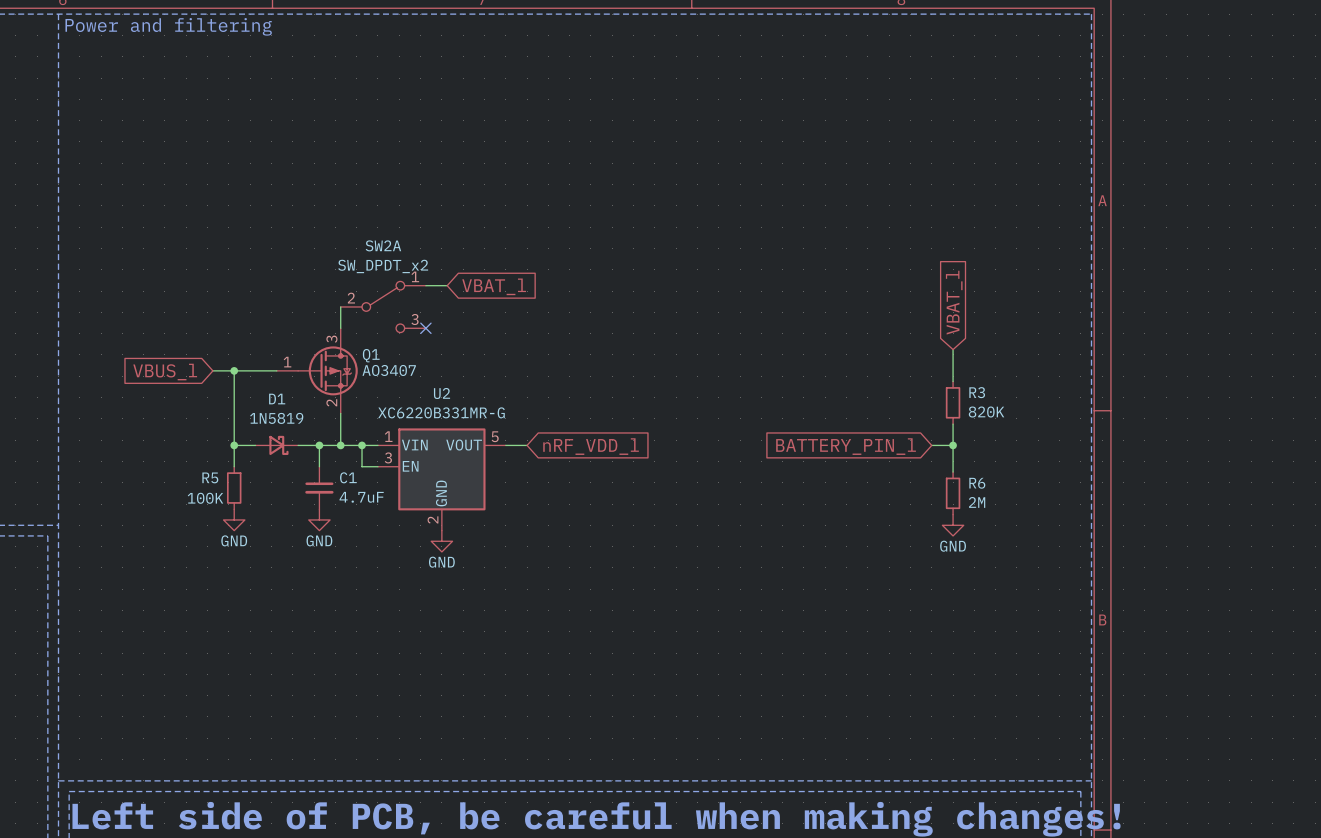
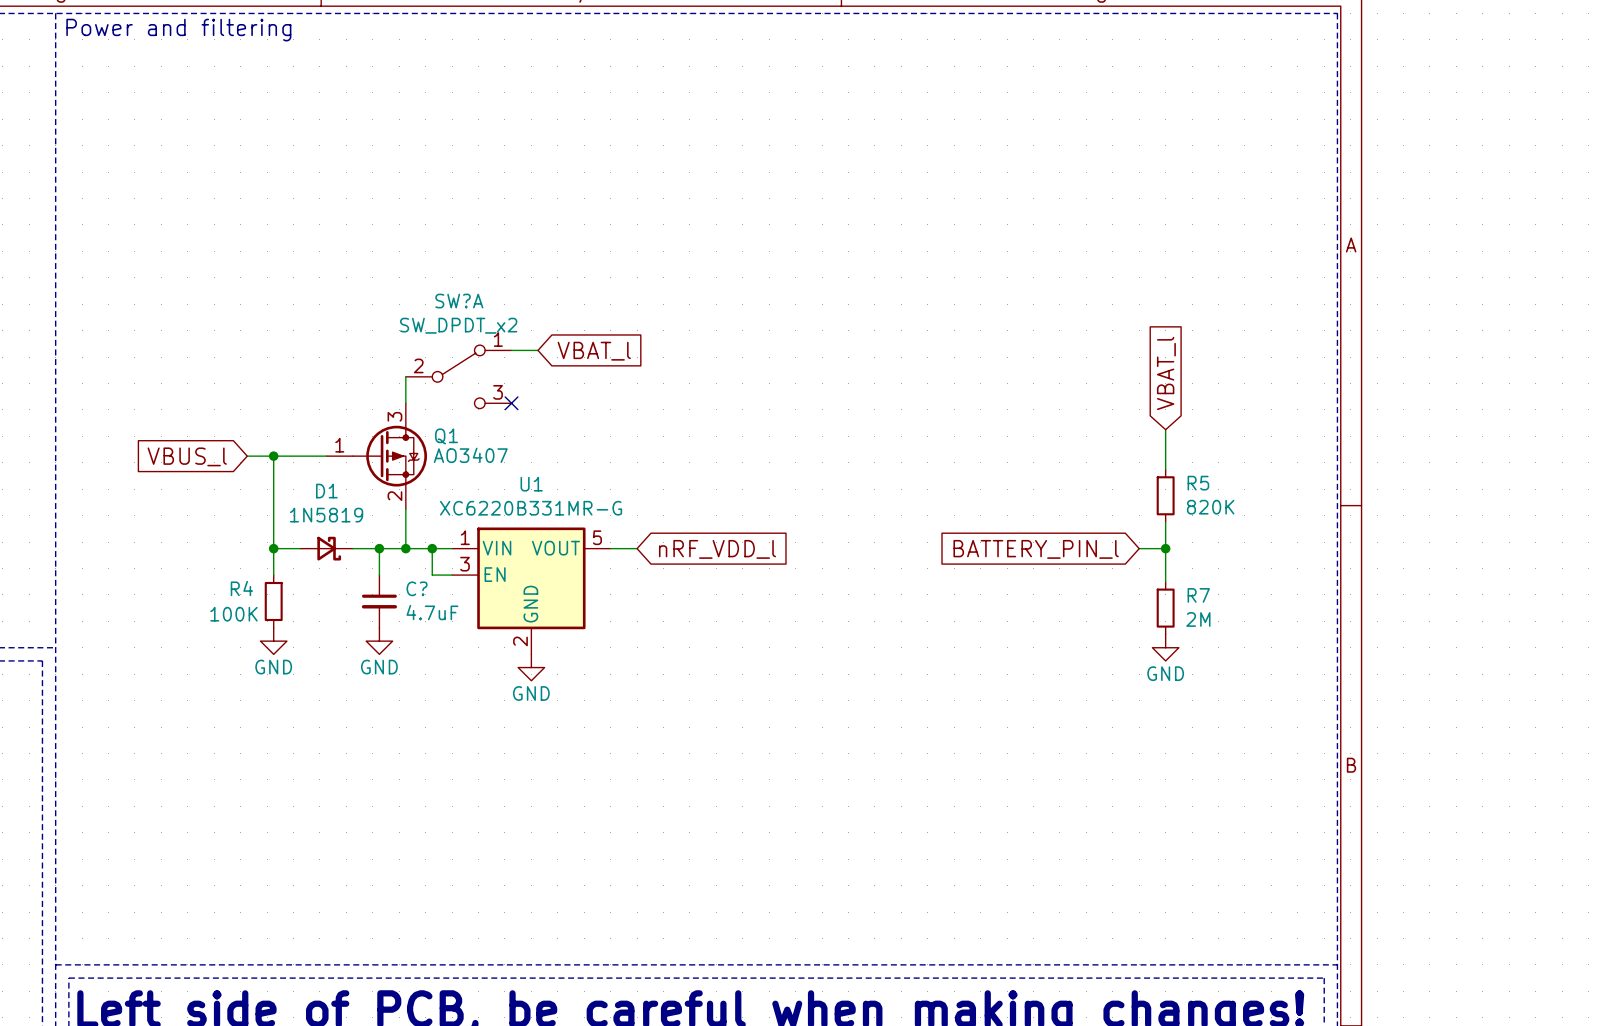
SW2A name: SW2A (383, 245) -> SW?A (459, 301)
R3 name: R3 (977, 392) -> R5 (1198, 483)
U2 name: U2 (442, 393) -> U1 (531, 484)
R5 name: R5 (210, 477) -> R4 (241, 588)
C1 name: C1 (348, 477) -> C? (417, 588)
R6 name: R6 (977, 483) -> R7 (1198, 595)

